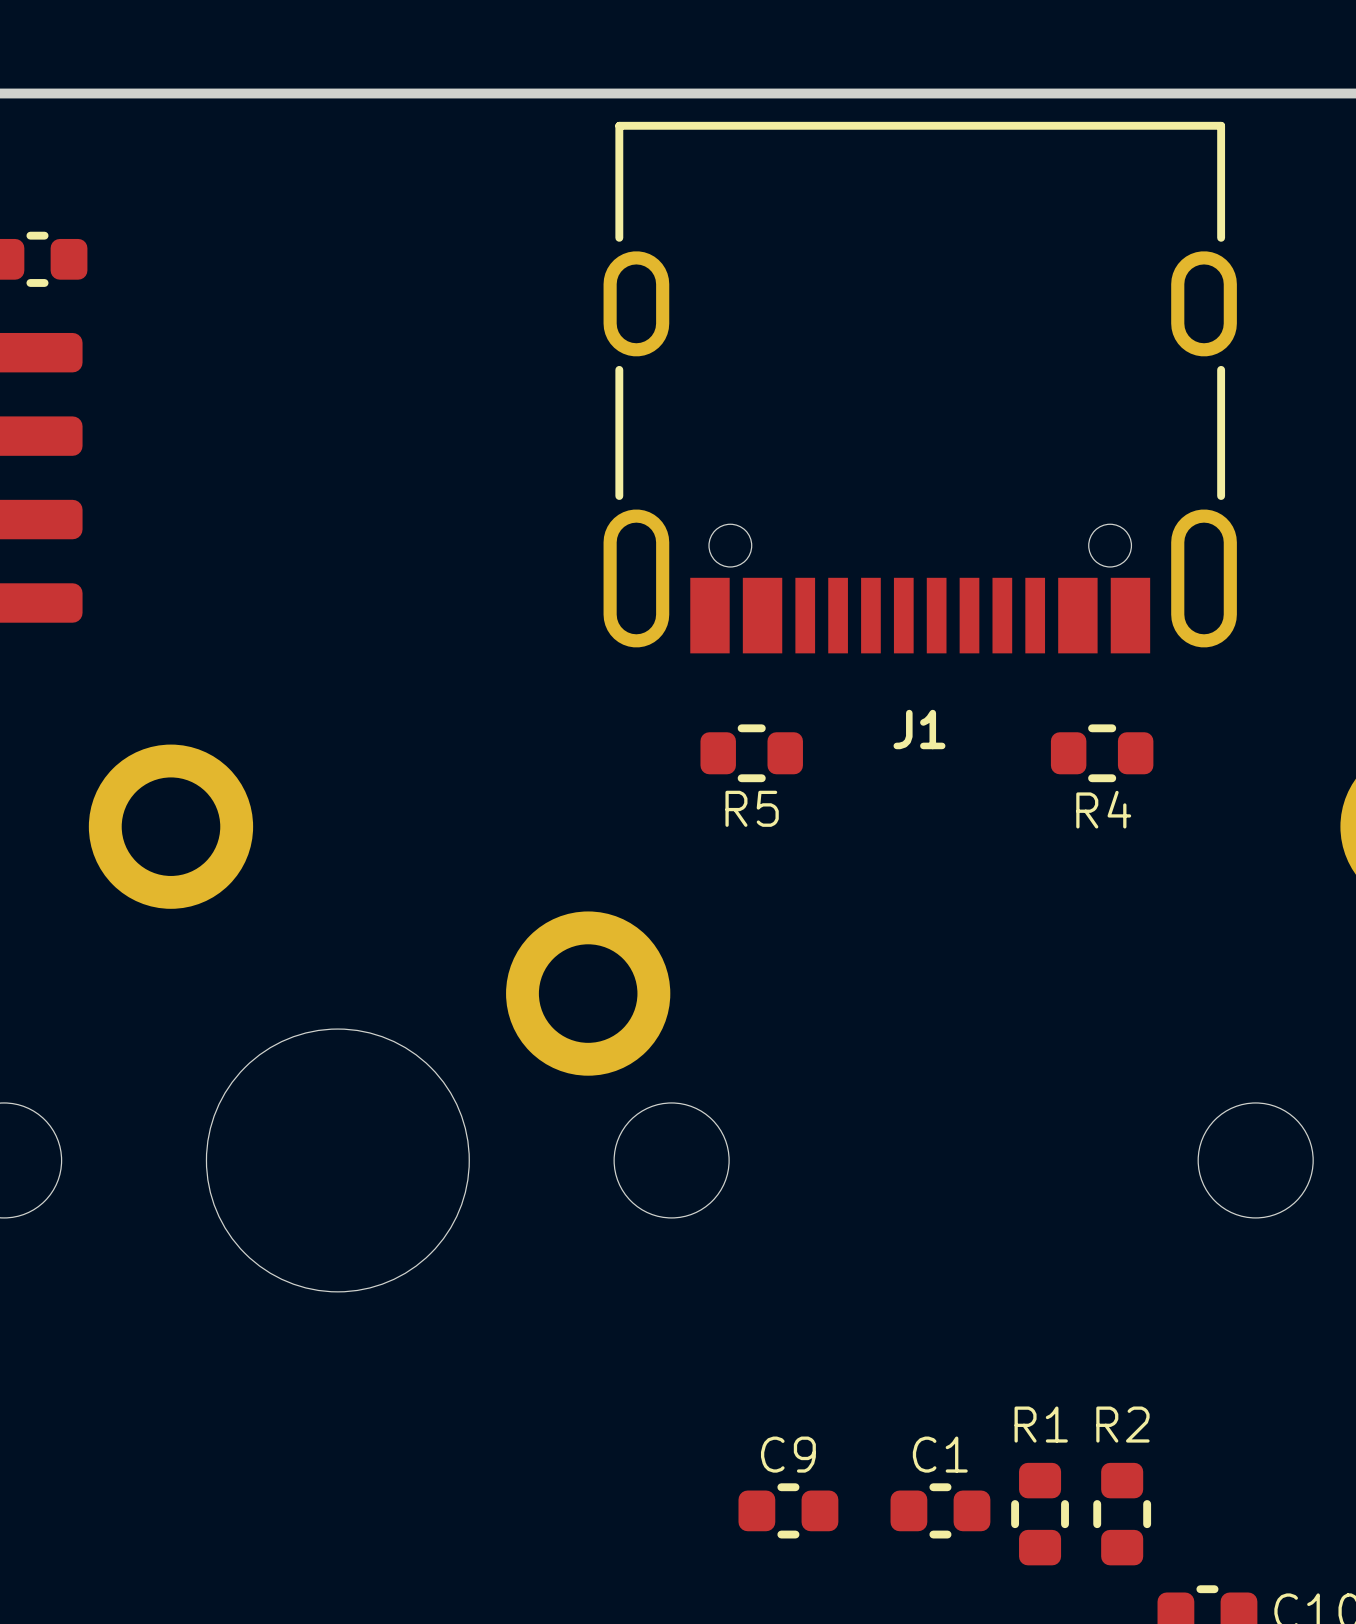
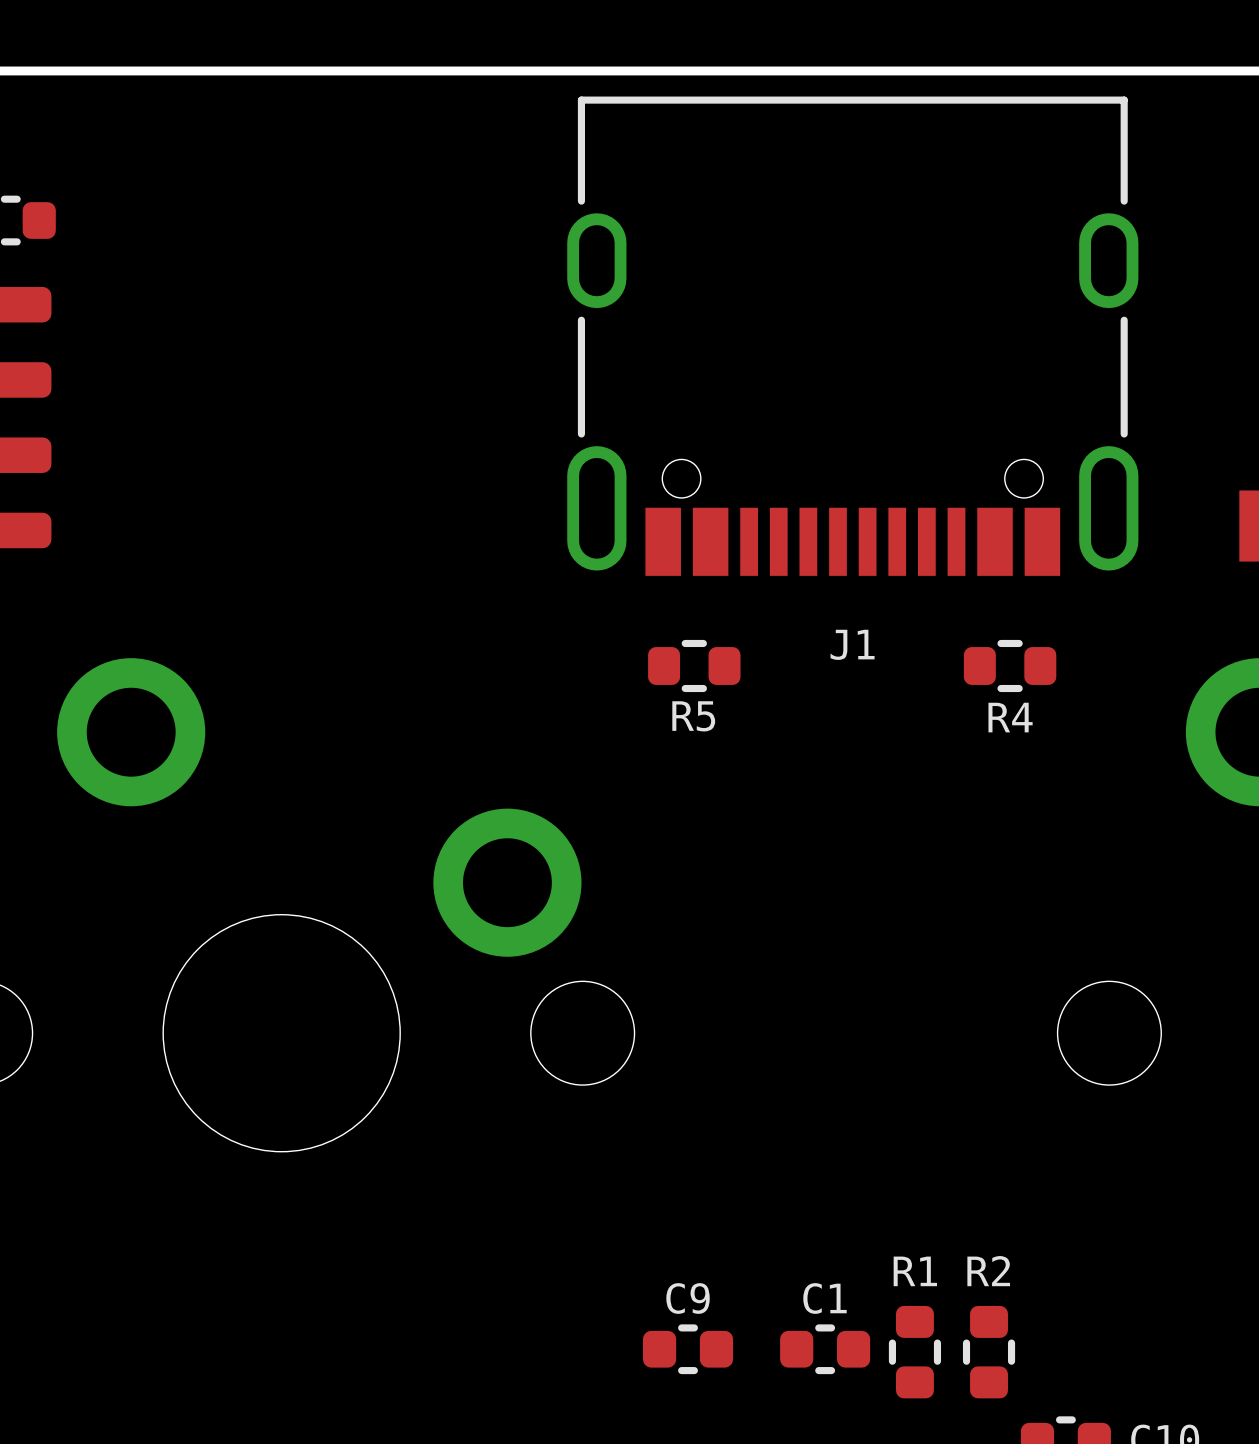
J1 position: (920, 387) -> (852, 336)
R5 position: (751, 753) -> (694, 665)
R4 position: (1102, 753) -> (1010, 665)

